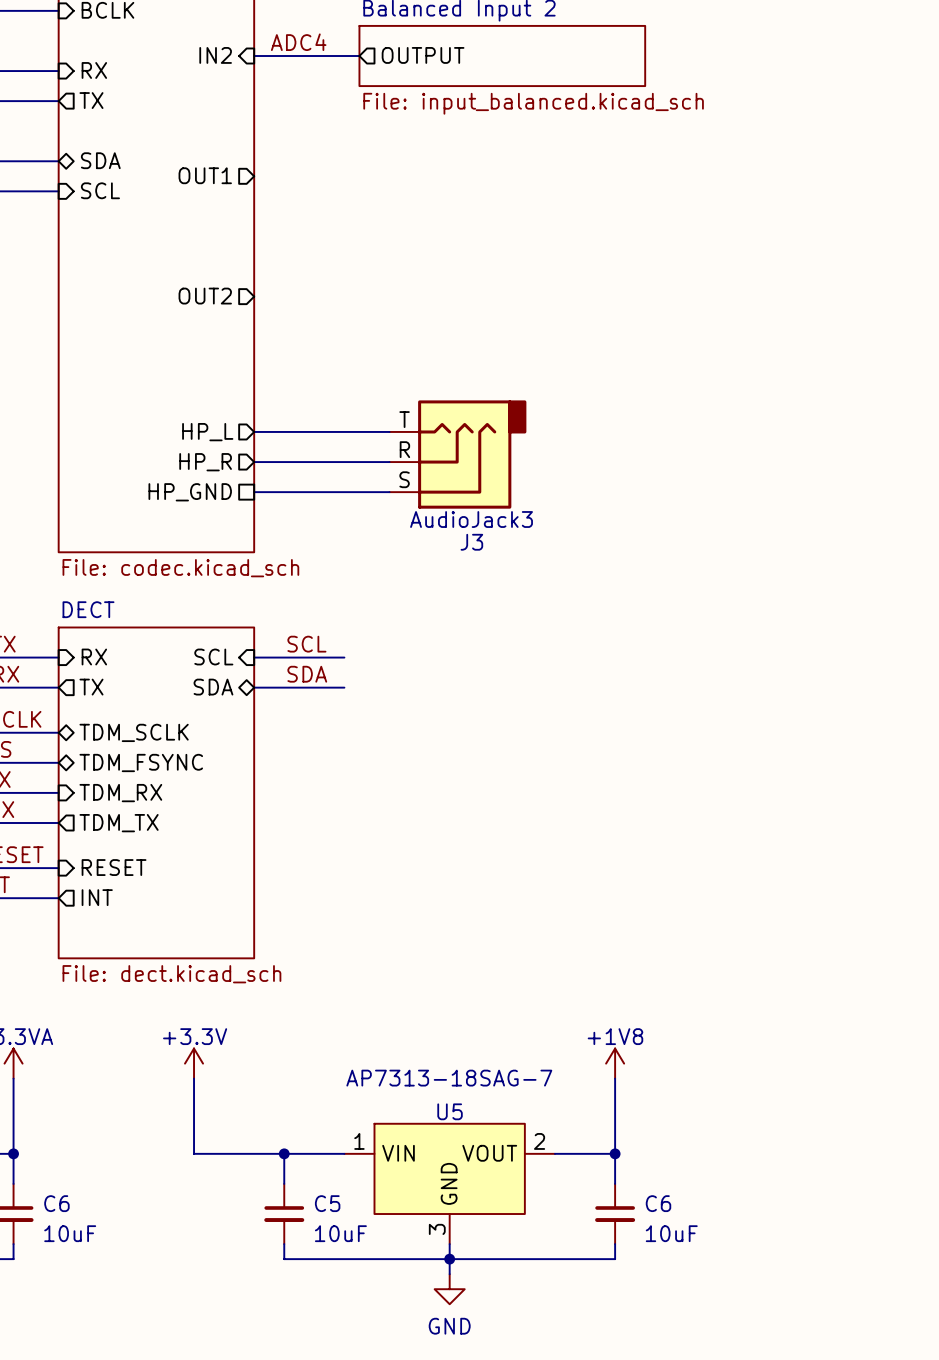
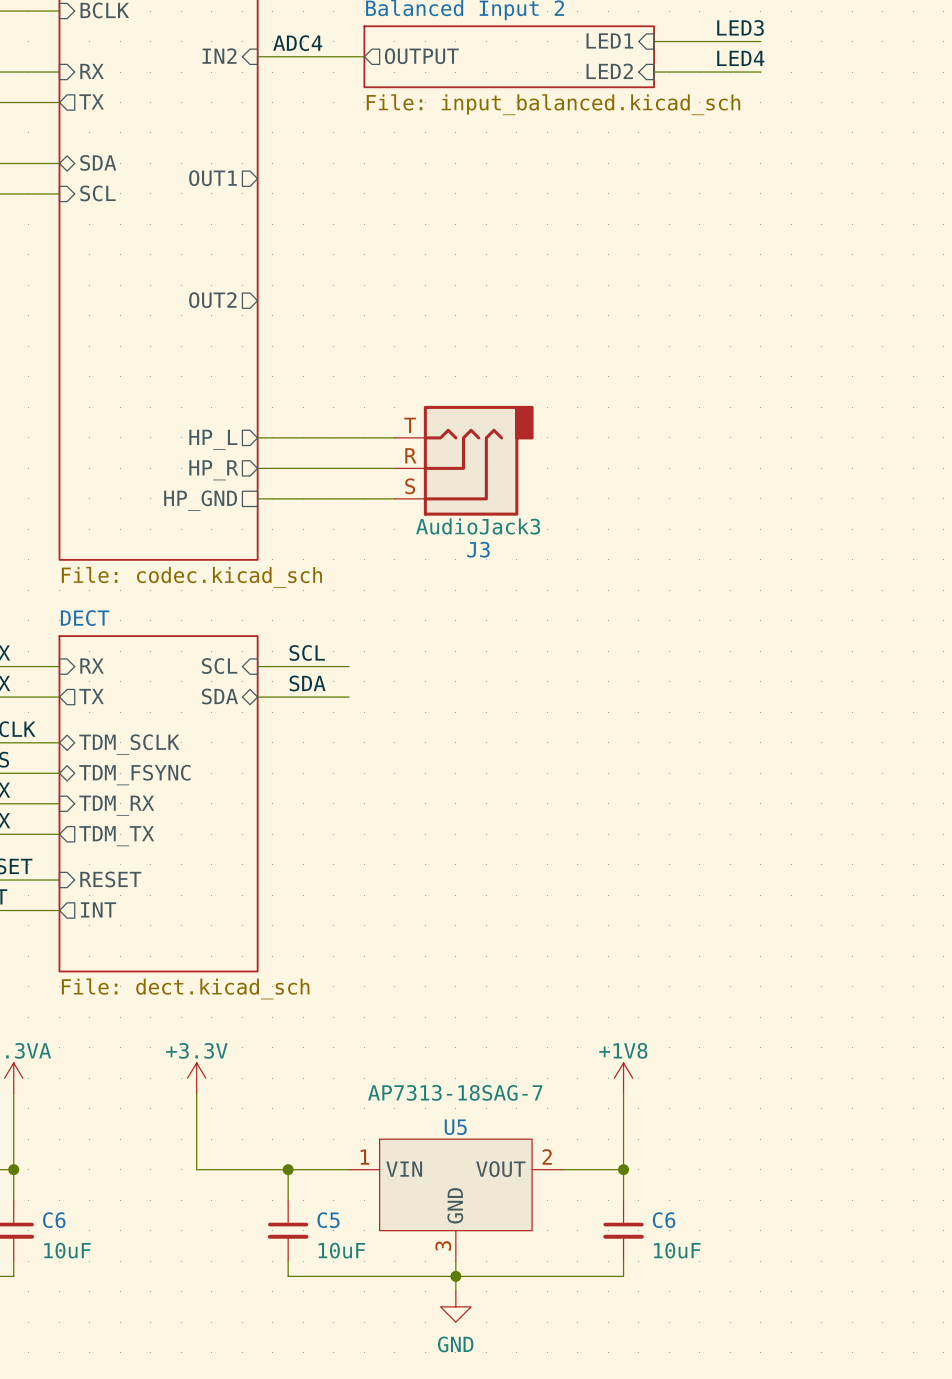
label: none -> LED3 (740, 27)
sheet pin: none -> LED1 (609, 40)
wire: none -> (654, 41) (760, 41)
label: none -> LED4 (740, 58)
sheet pin: none -> LED2 (609, 71)
wire: none -> (654, 72) (760, 72)

